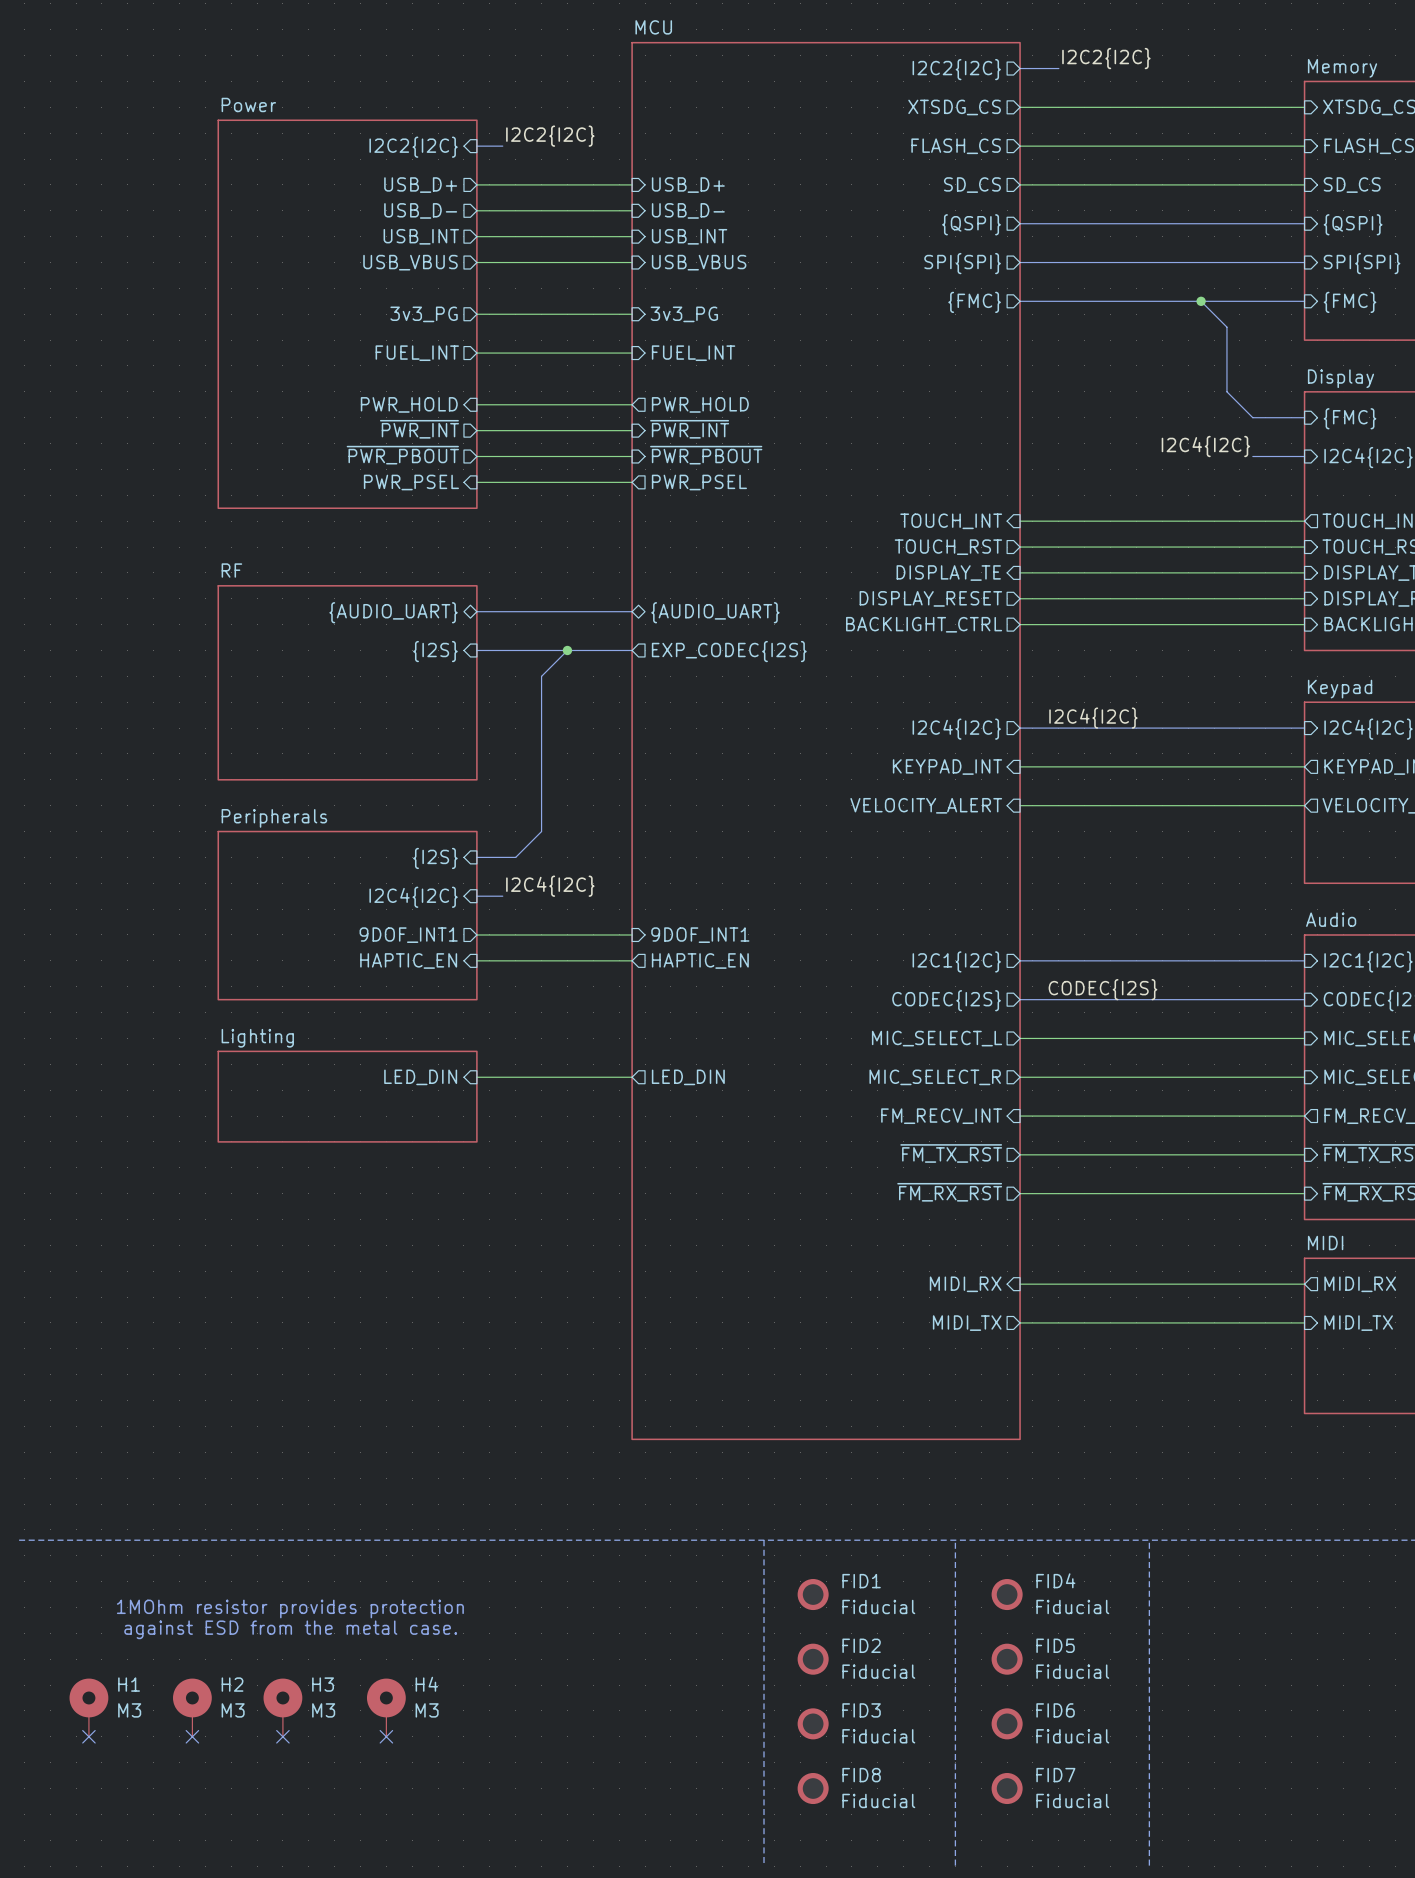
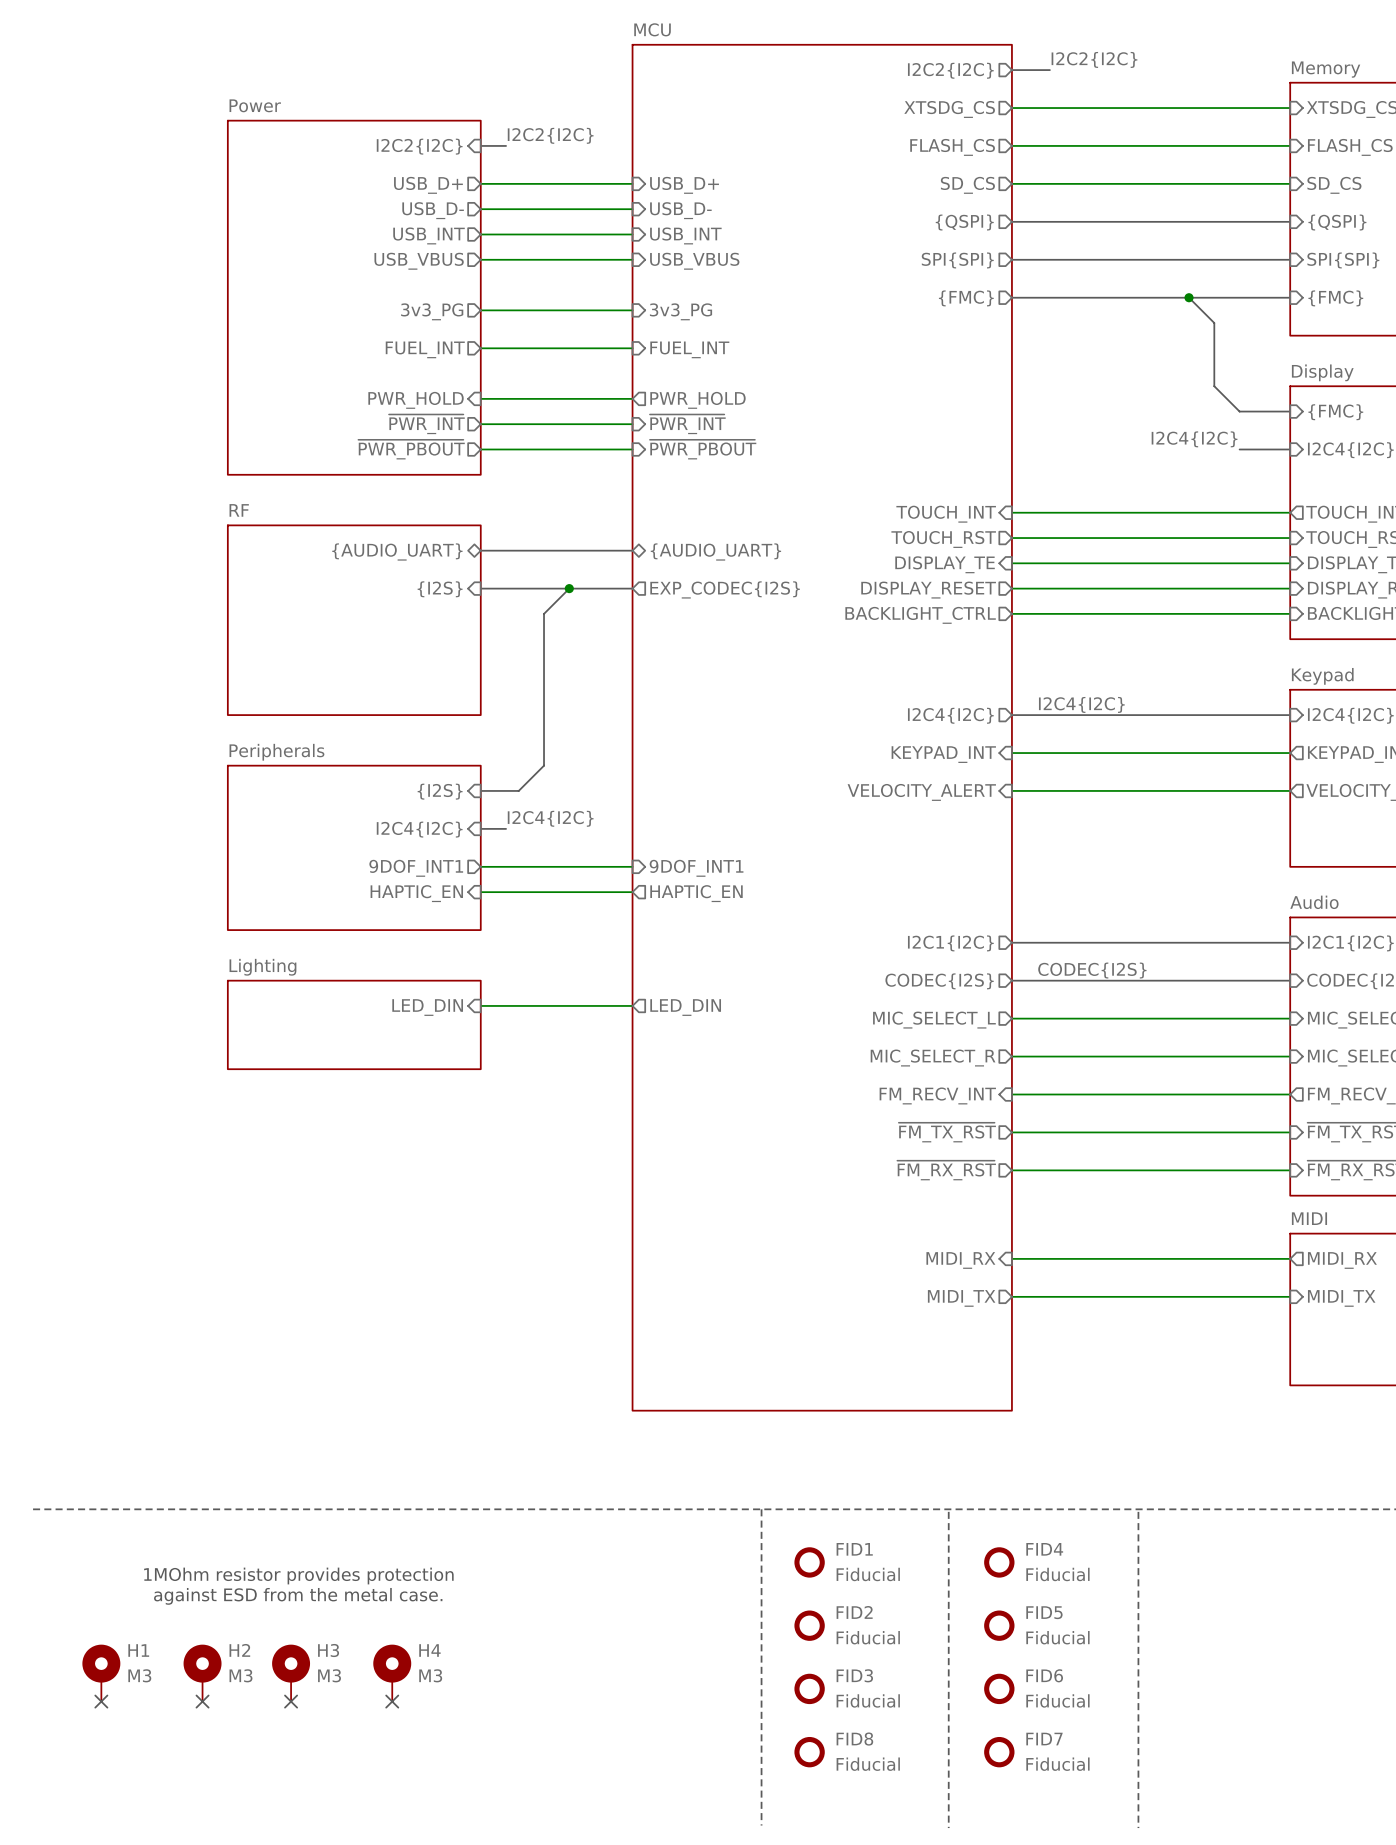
sheet Power: none -> (354, 297)
sheet Power: (347, 314) -> none
sheet pin: PWR_PSEL (411, 482) -> none
wire: (476, 482) (632, 482) -> none
sheet pin: PWR_PSEL (699, 482) -> none
bus: (476, 611) (632, 611) -> (480, 550) (632, 550)
sheet pin position: {AUDIO_UART} (393, 612) -> {AUDIO_UART} (397, 551)
sheet pin position: {AUDIO_UART} (715, 612) -> {AUDIO_UART} (715, 551)
bus: (476, 650) (632, 650) -> (480, 588) (632, 588)
bus: (567, 650) (541, 676) -> (569, 588) (544, 613) (544, 664)
junction position: (567, 650) -> (569, 588)
sheet pin position: {I2S} (435, 651) -> {I2S} (440, 589)
sheet pin position: EXP_CODEC{I2S} (729, 651) -> EXP_CODEC{I2S} (725, 589)
sheet RF position: (347, 682) -> (354, 620)
bus: (541, 779) (541, 831) (515, 857) (476, 857) -> (544, 765) (518, 790) (480, 790)
sheet pin position: {I2S} (435, 858) -> {I2S} (440, 791)
label position: I2C4{I2C} (550, 886) -> I2C4{I2C} (550, 818)
bus: (476, 896) (502, 896) -> (480, 828) (506, 828)
sheet pin position: I2C4{I2C} (413, 897) -> I2C4{I2C} (419, 829)
sheet Peripherals position: (347, 915) -> (354, 847)
wire: (476, 934) (632, 934) -> (480, 866) (632, 866)
sheet pin position: 9DOF_INT1 (408, 935) -> 9DOF_INT1 (416, 868)
sheet pin position: 9DOF_INT1 (700, 935) -> 9DOF_INT1 (696, 868)
sheet pin position: HAPTIC_EN (408, 960) -> HAPTIC_EN (416, 893)
wire: (476, 960) (632, 960) -> (480, 892) (632, 892)
sheet pin position: HAPTIC_EN (700, 960) -> HAPTIC_EN (696, 893)
sheet pin position: LED_DIN (420, 1077) -> LED_DIN (427, 1007)
wire: (476, 1077) (632, 1077) -> (480, 1005) (632, 1005)
sheet pin position: LED_DIN (688, 1077) -> LED_DIN (685, 1007)
sheet Lighting position: (347, 1096) -> (354, 1024)

